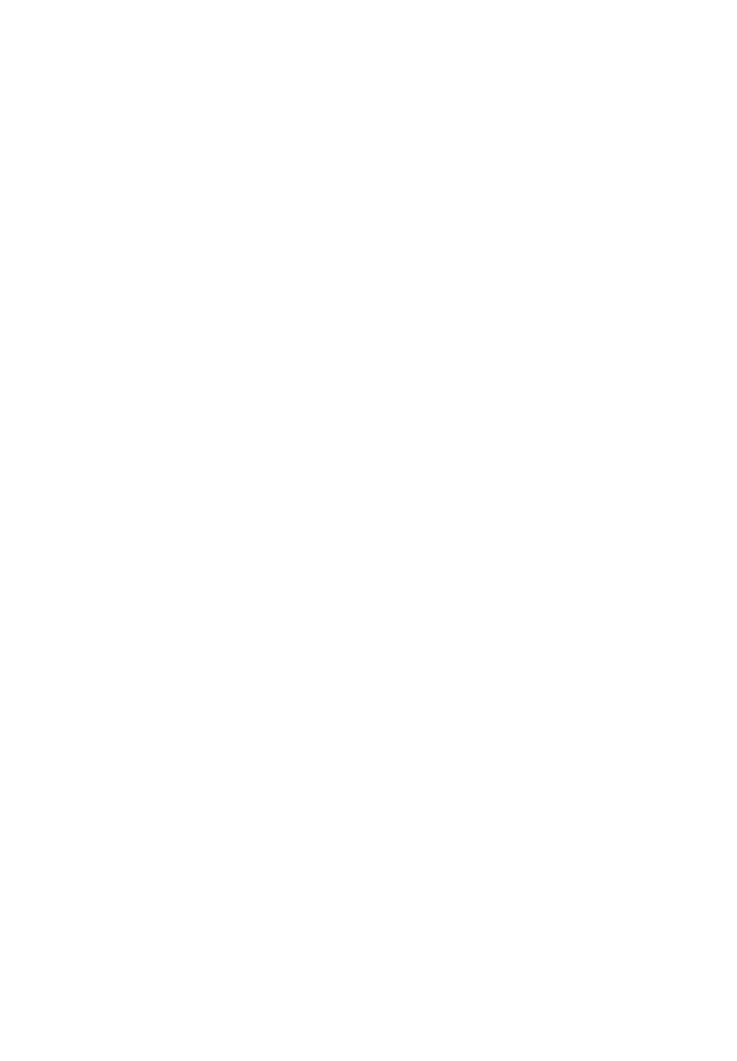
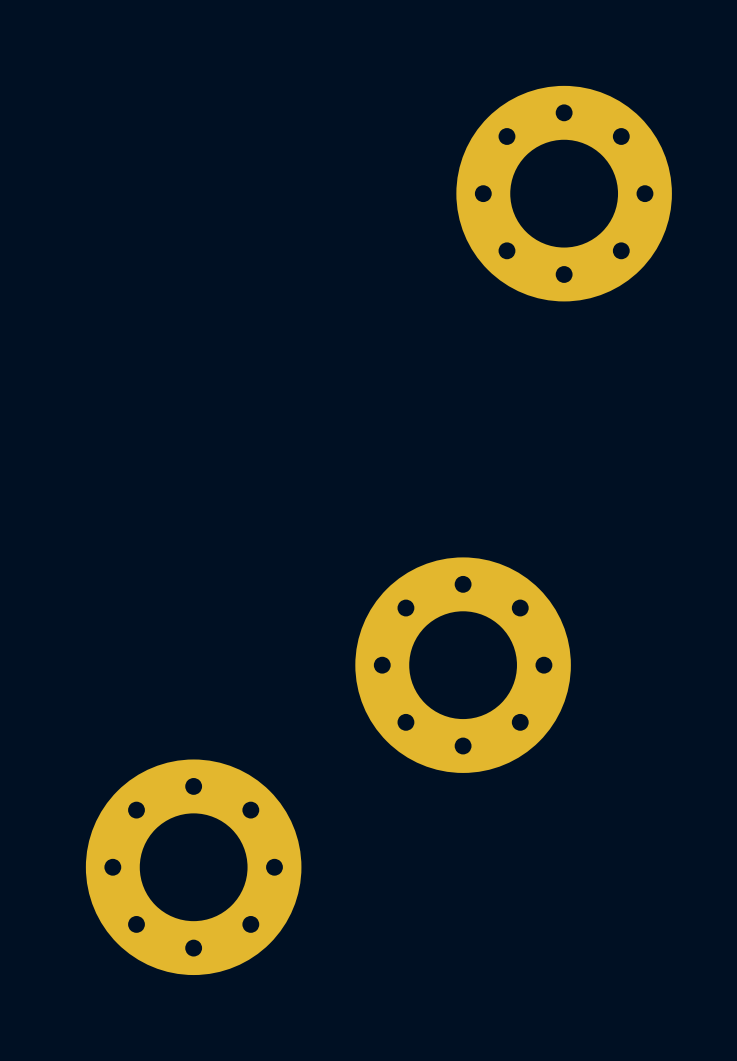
part: none -> (564, 193)
part: none -> (463, 665)
part: none -> (193, 867)

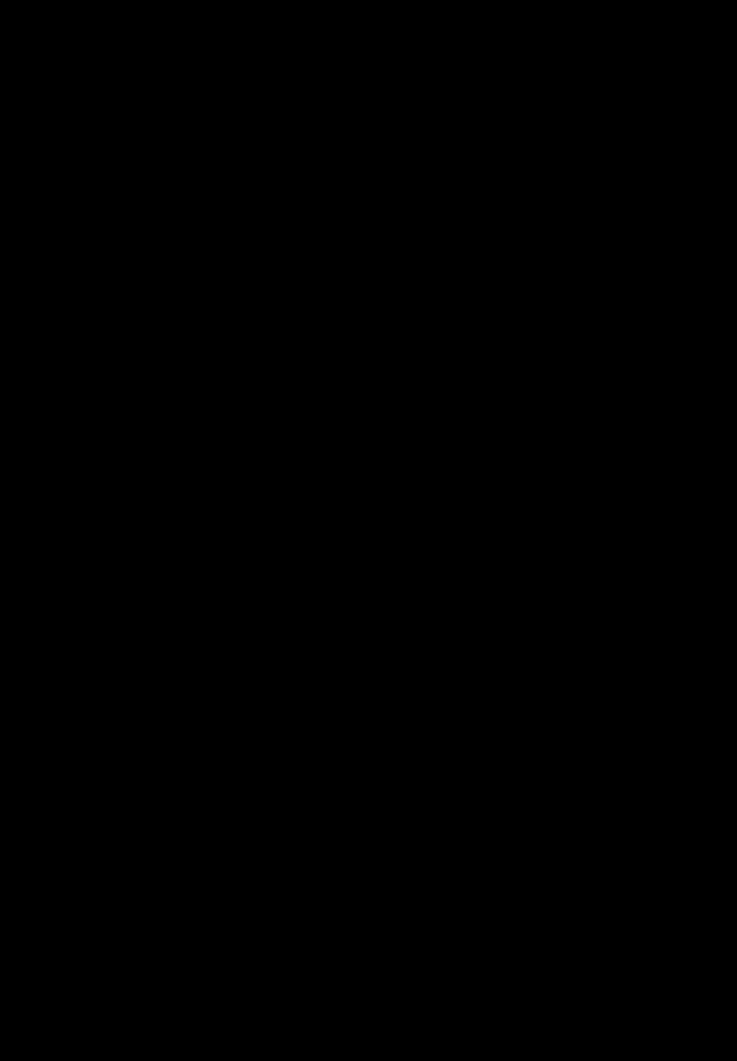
part: (564, 193) -> none
part: (463, 665) -> none
part: (193, 867) -> none

